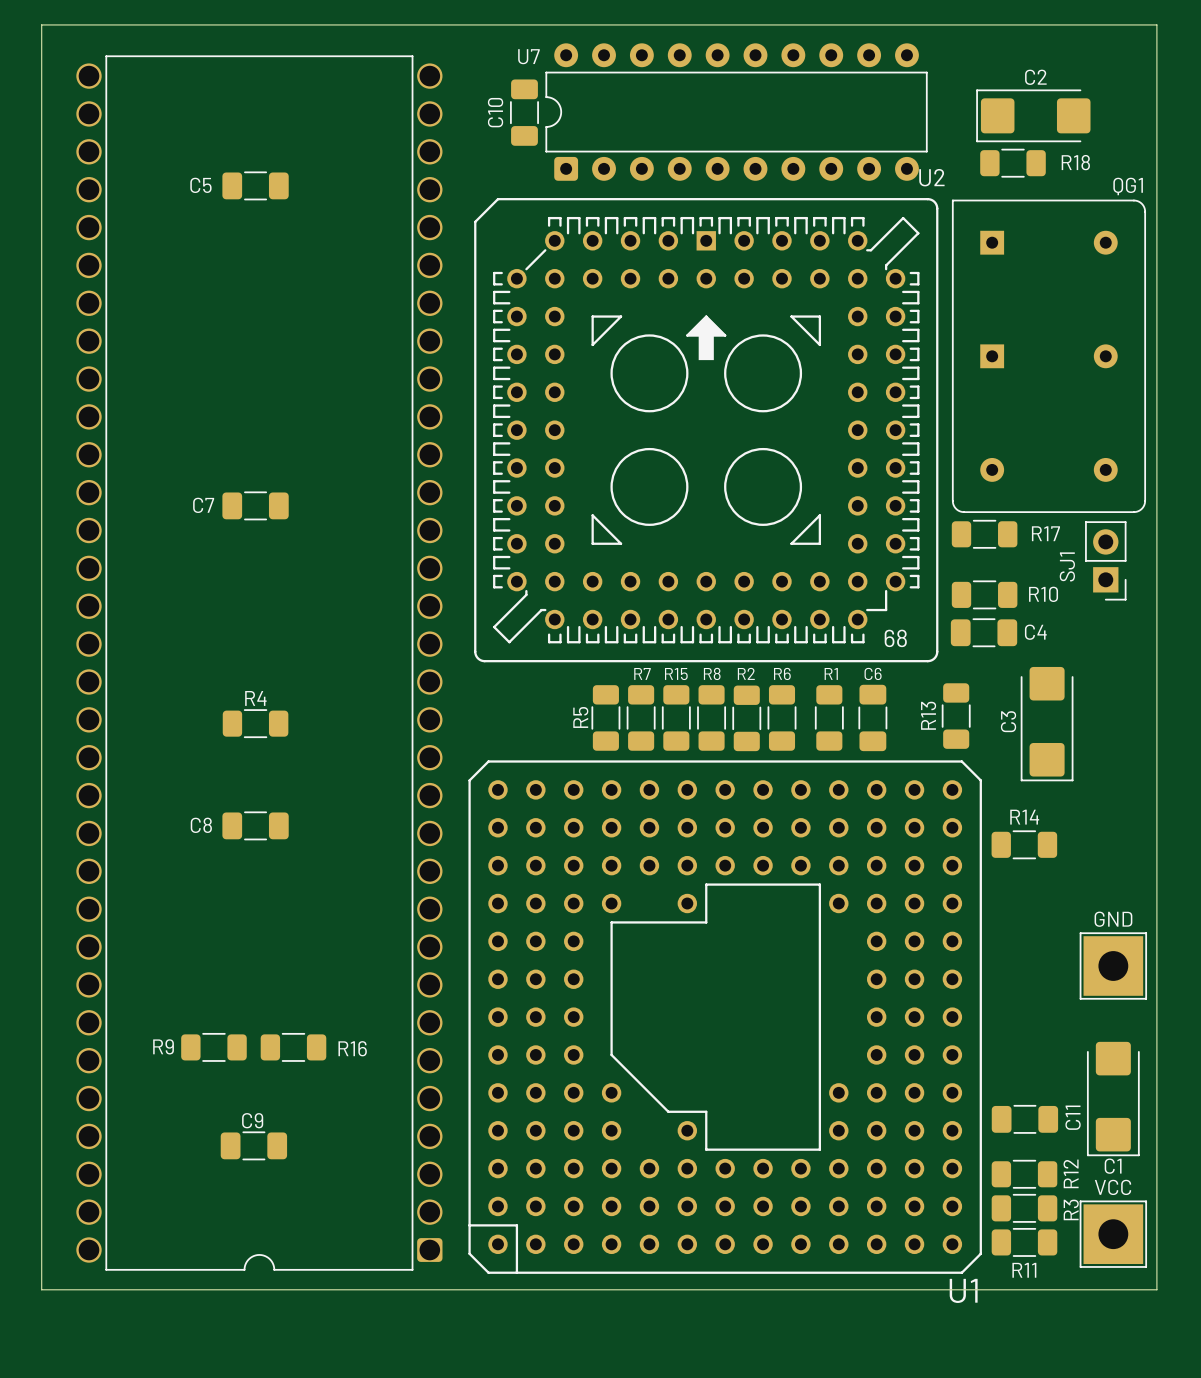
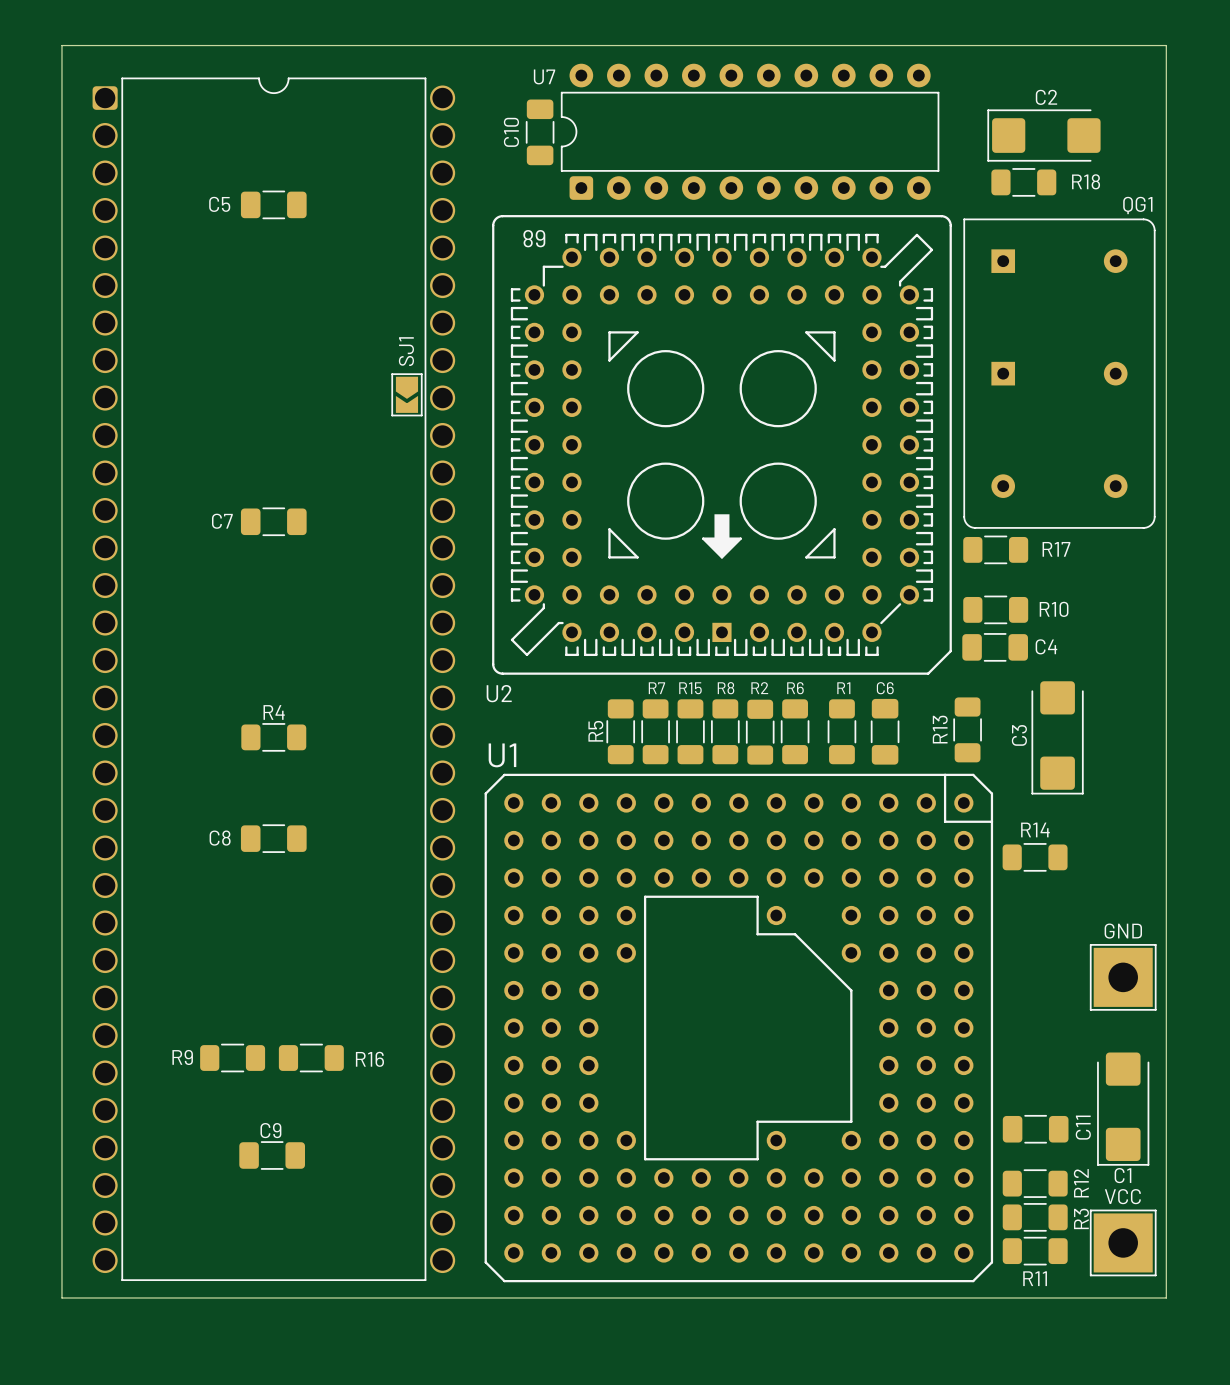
U2 rotation: 0° (706, 430) -> 180° (721, 444)
SJ1 footprint: [1085, 521, 1127, 601] -> [391, 373, 423, 417]
SJ1 name position: SJ1 (1067, 566) -> SJ1 (406, 351)
part rotation: 0° (259, 663) -> 180° (273, 679)
U1 rotation: 0° (725, 1017) -> 180° (738, 1028)

